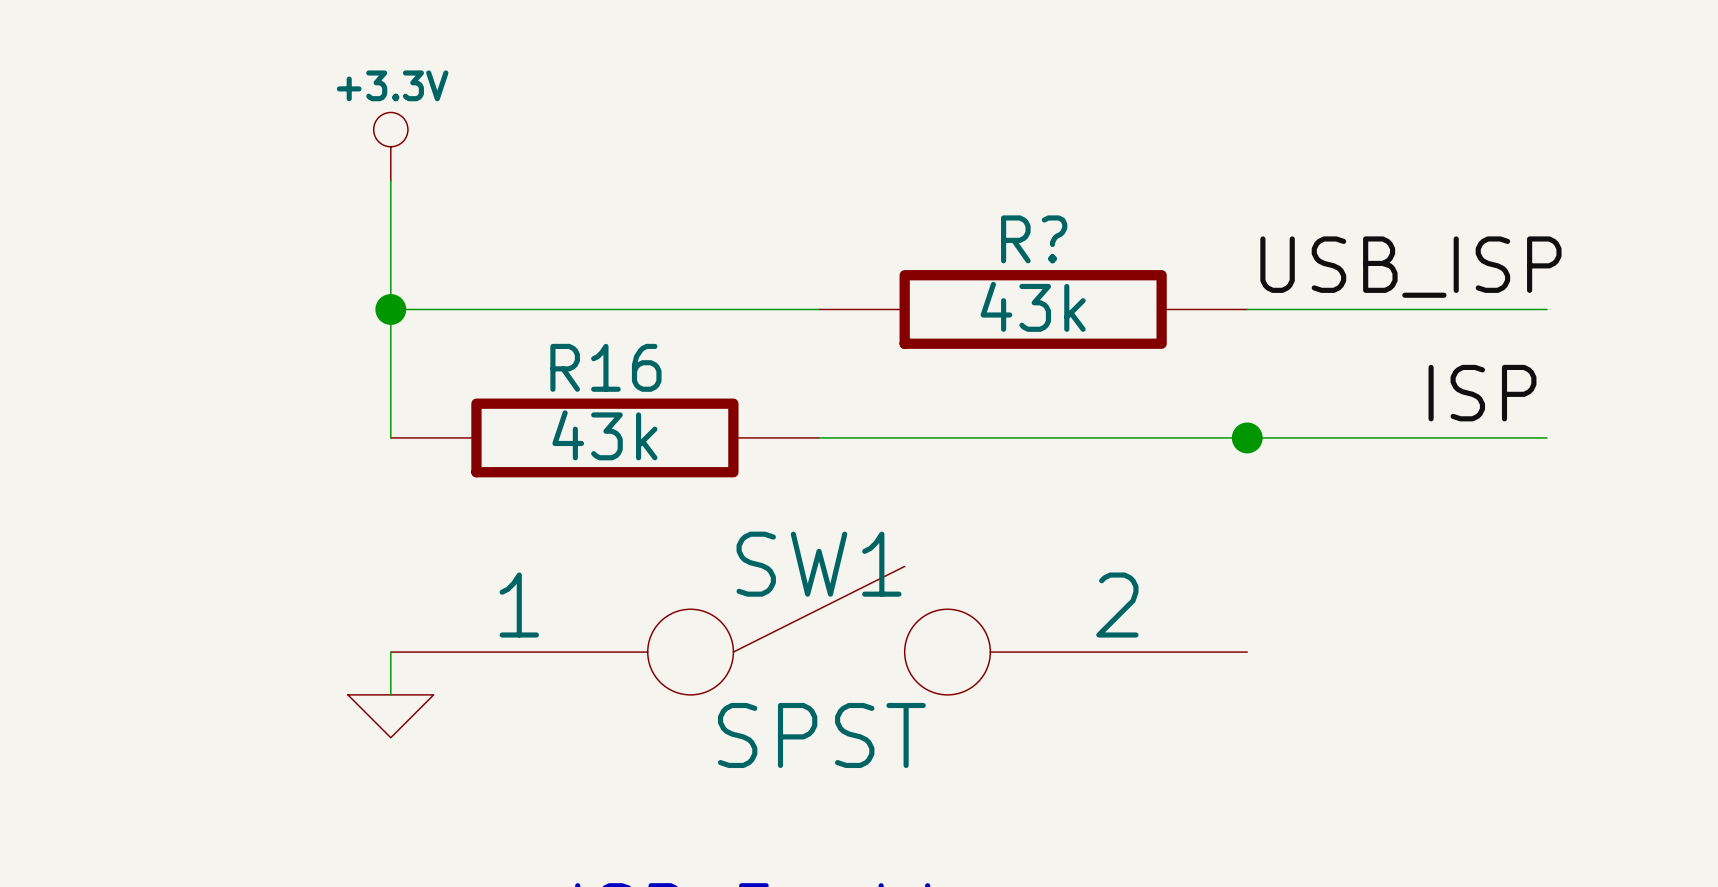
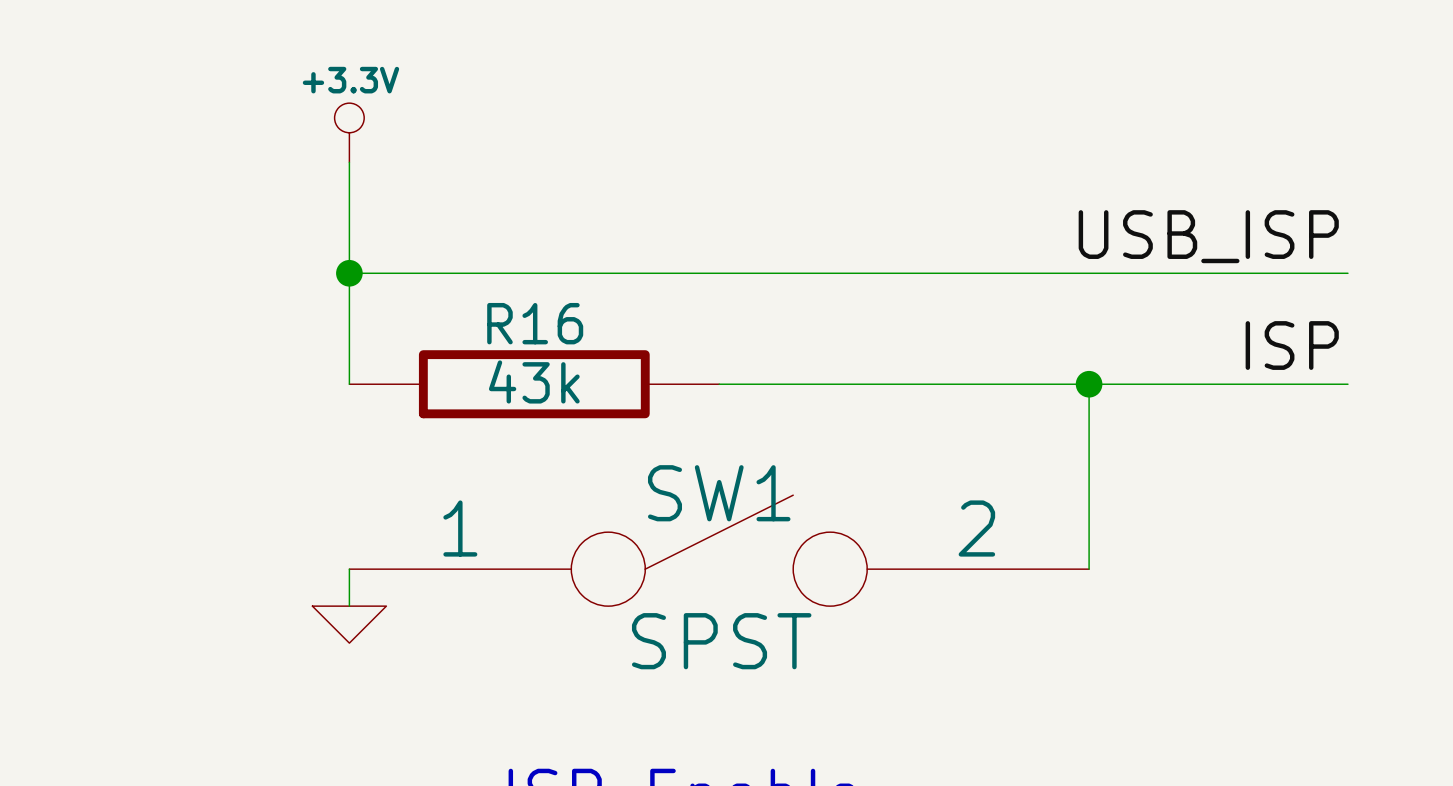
label position: USB_ISP (1410, 267) -> USB_ISP (1208, 236)
wire: none -> (719, 273) (1089, 273)
R?: 43k (1033, 309) -> none
wire: none -> (1089, 384) (1089, 569)

